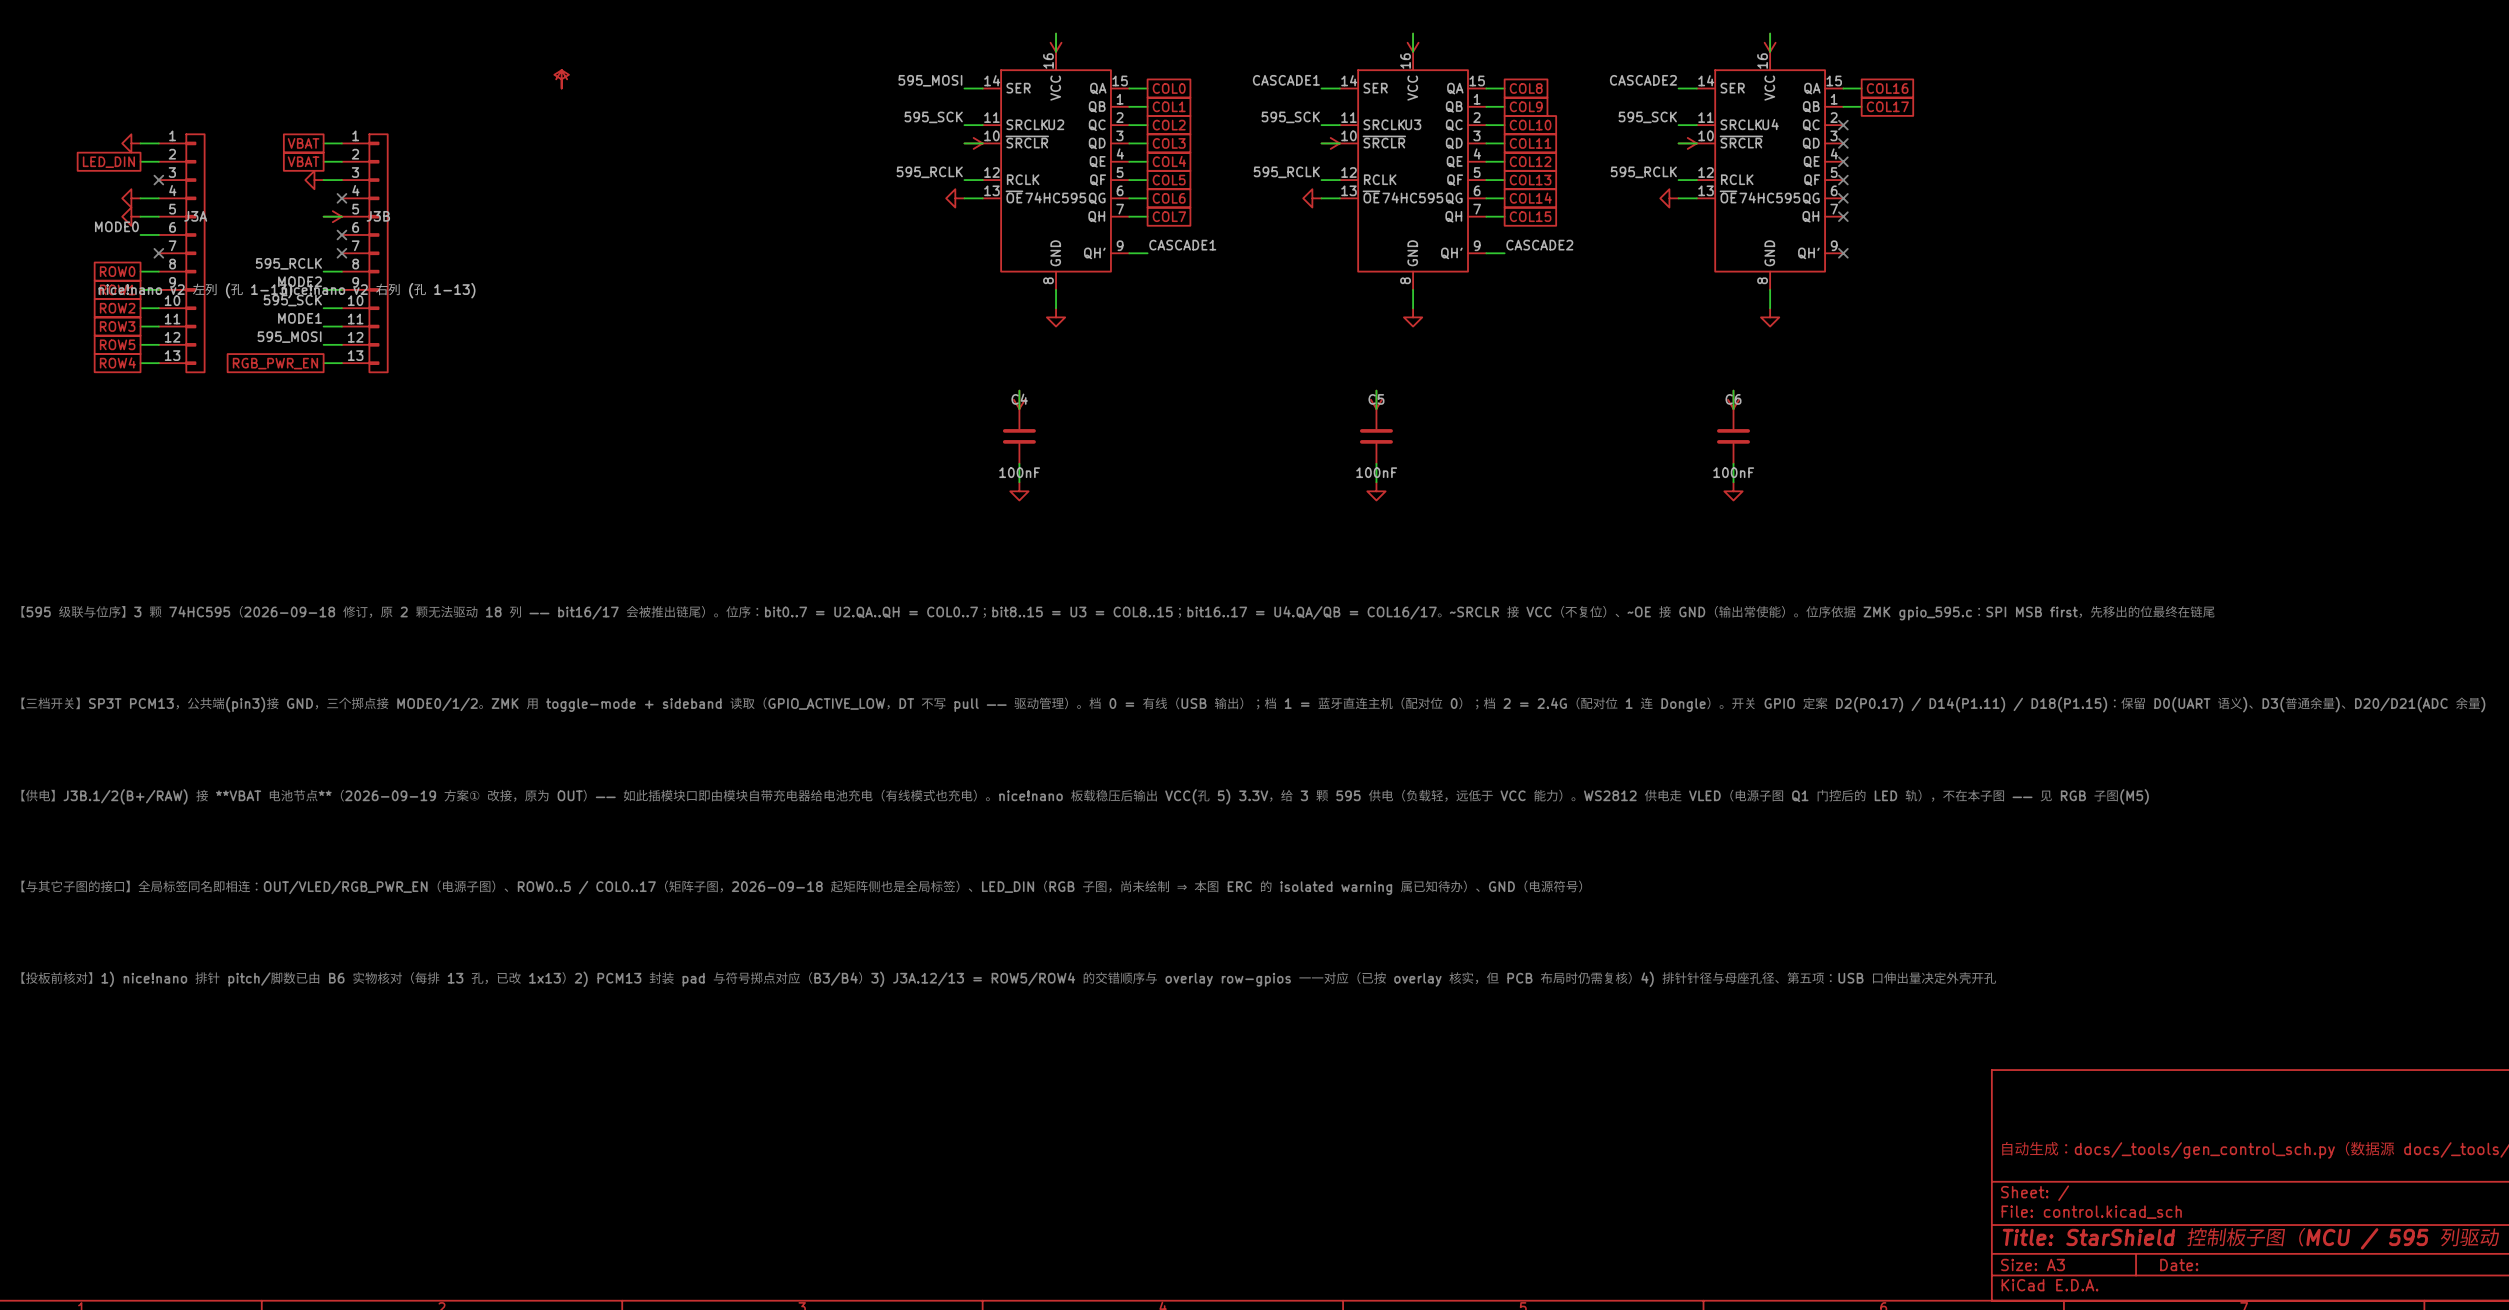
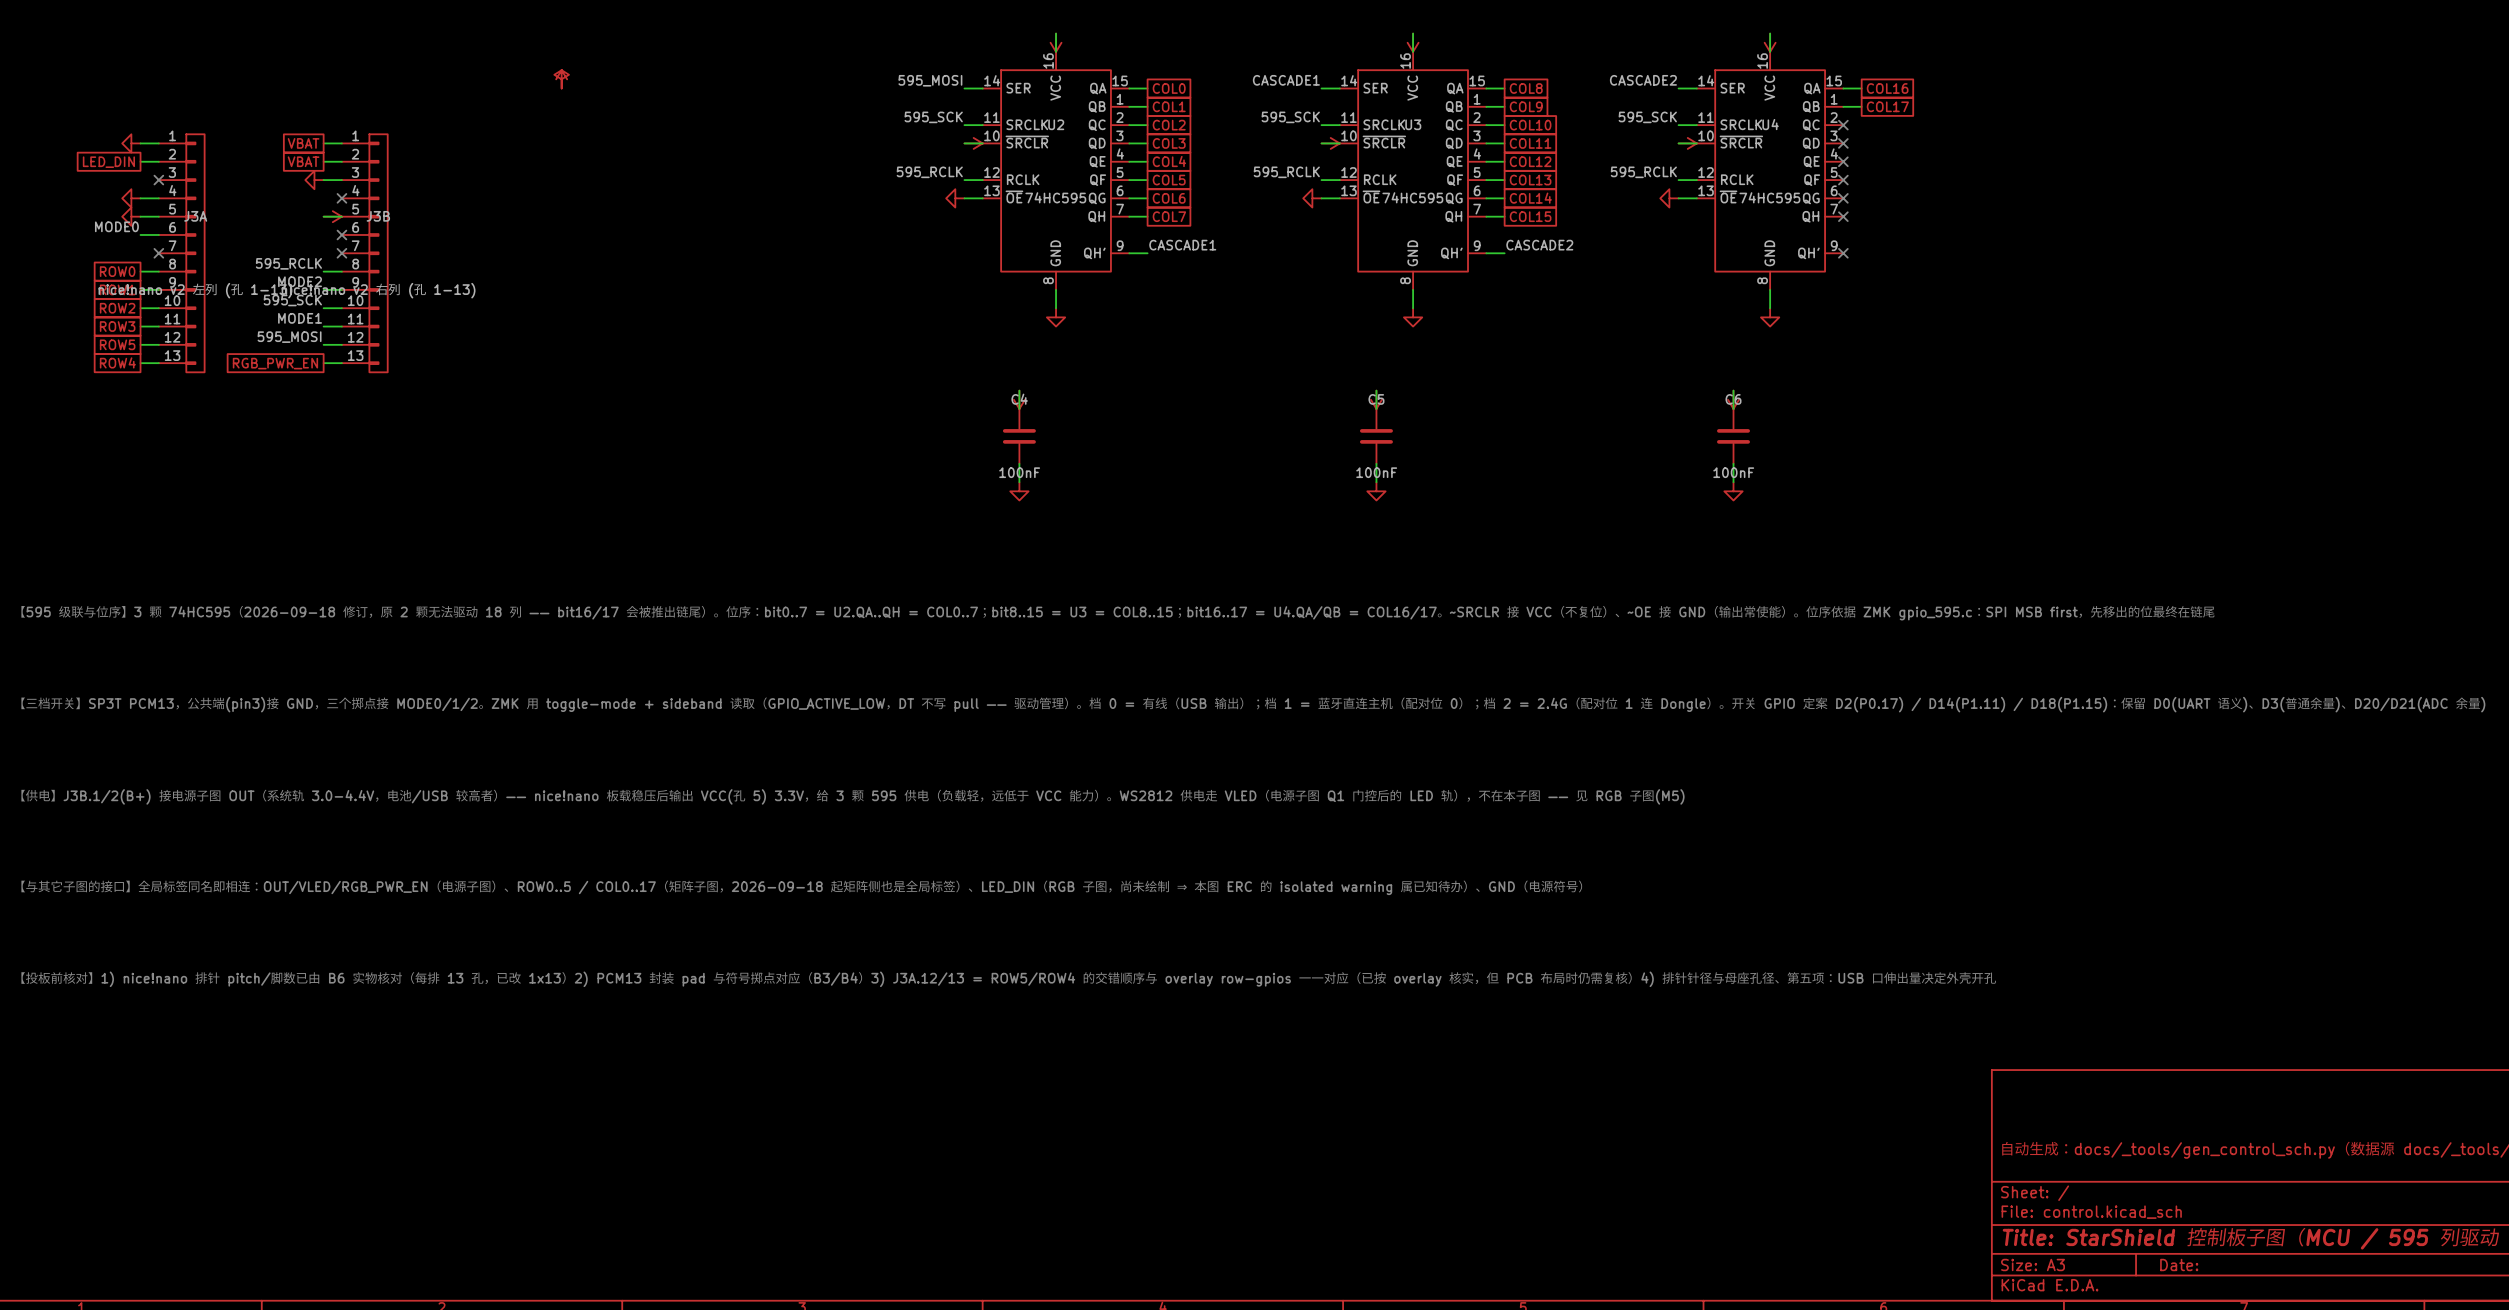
text: 【供电】J3B.1/2(B+/RAW) 接 **VBAT 电池节点**（2026-09-19 方案① 改接，原为 OUT）—— 如此插模块口即由模块自带充电器给电池充电（有线模式也充电）。nice!nano 板载稳压后输出 VCC(孔 5) 3.3V，给 3 颗 595 供电（负载轻，远低于 VCC 能力）。WS2812 供电走 VLED（电源子图 Q1 门控后的 LED 轨），不在本子图 —— 见 RGB 子图(M5) (1084, 796) -> 【供电】J3B.1/2(B+) 接电源子图 OUT（系统轨 3.0-4.4V，电池/USB 较高者）—— nice!nano 板载稳压后输出 VCC(孔 5) 3.3V，给 3 颗 595 供电（负载轻，远低于 VCC 能力）。WS2812 供电走 VLED（电源子图 Q1 门控后的 LED 轨），不在本子图 —— 见 RGB 子图(M5) (852, 796)

